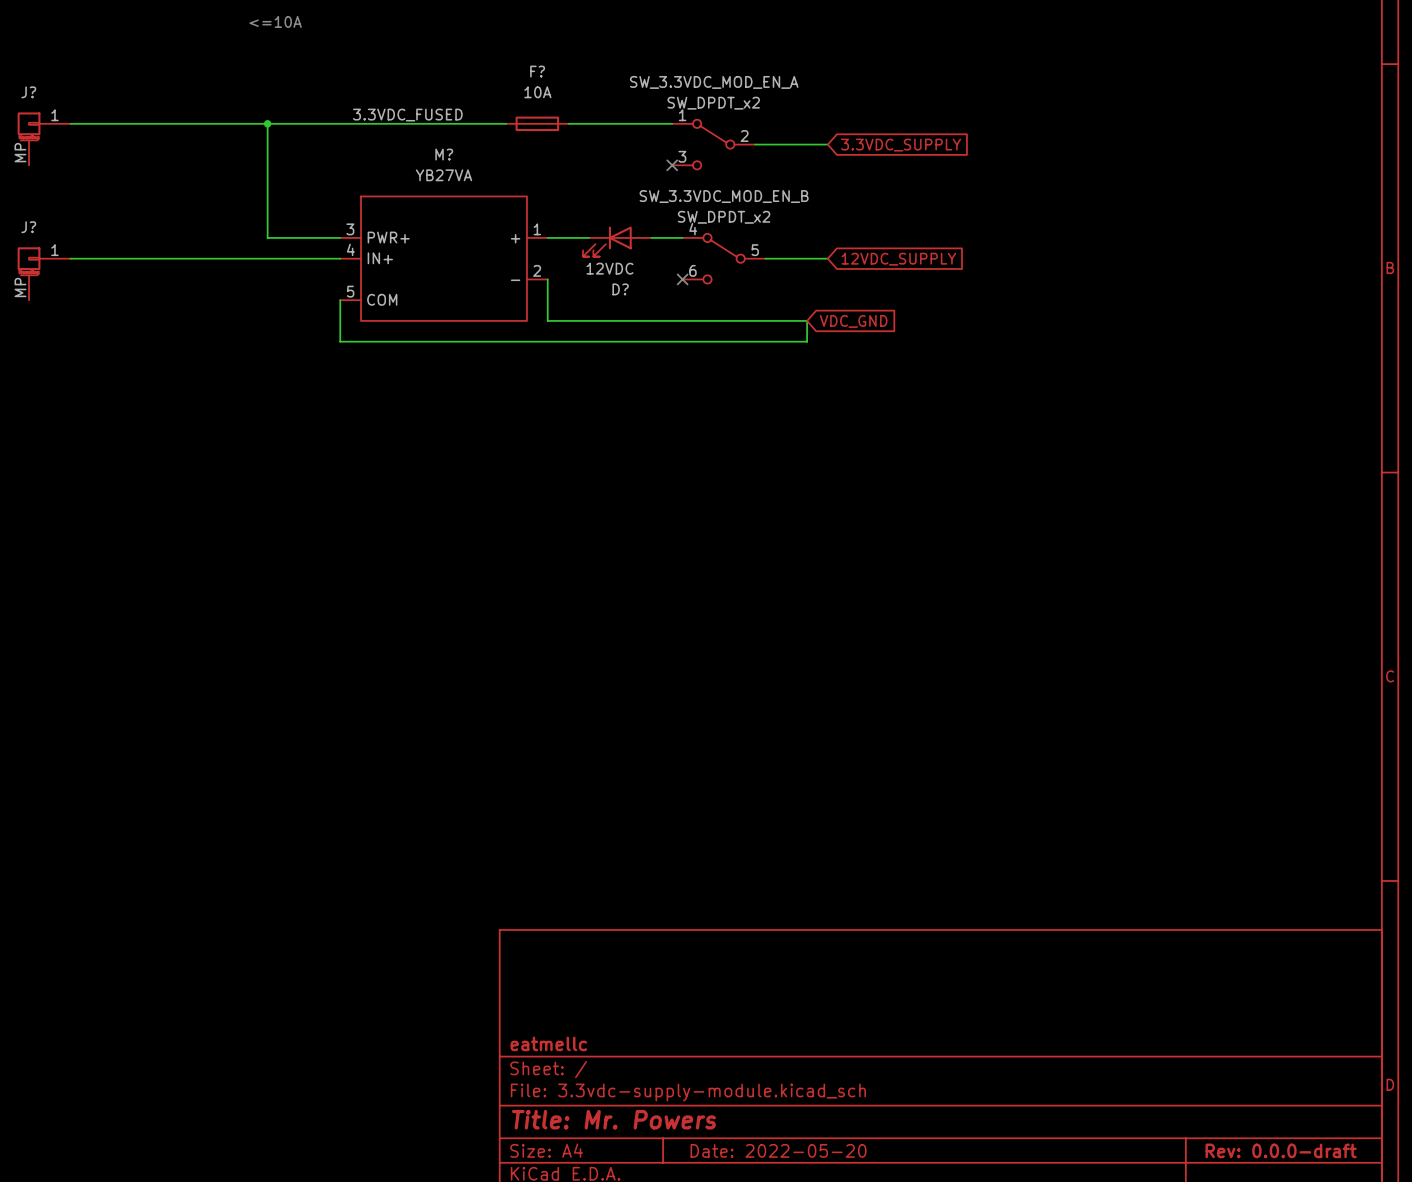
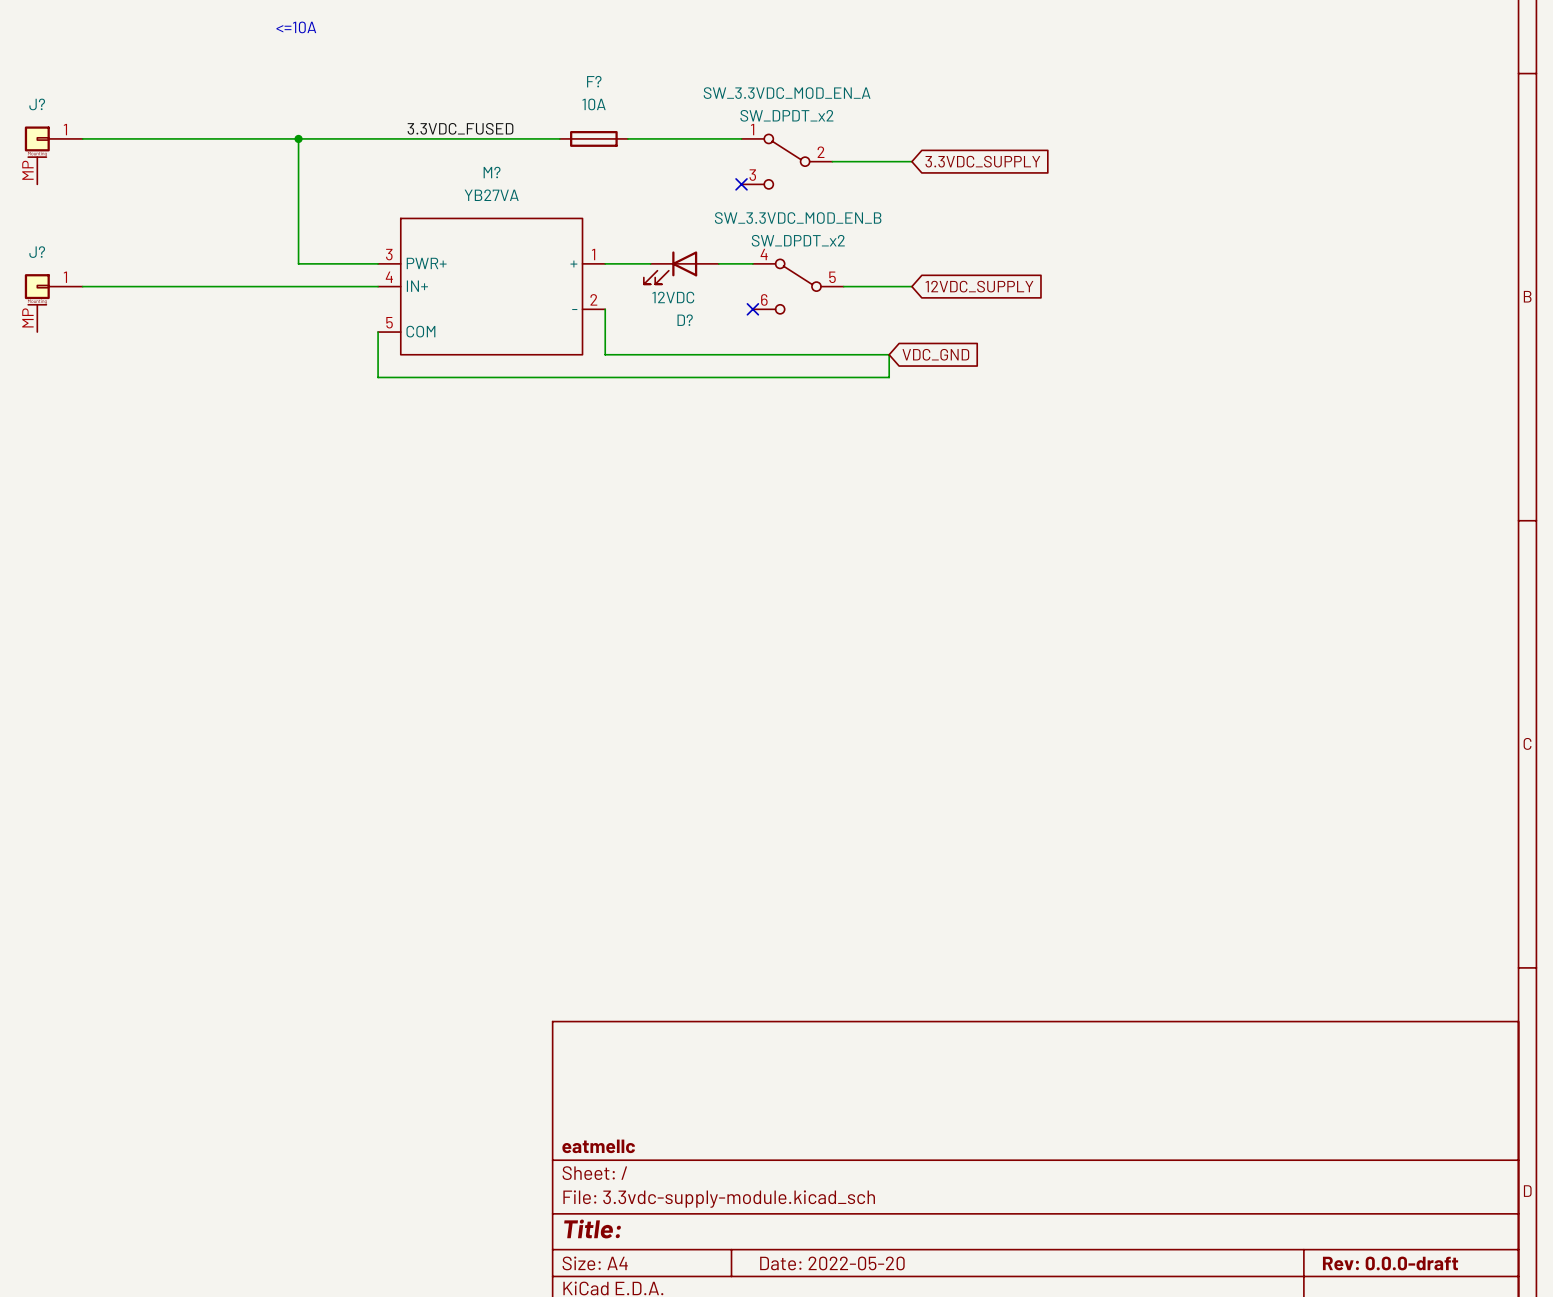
title block: Title: Mr. Powers (613, 1119) -> Title: (592, 1229)

